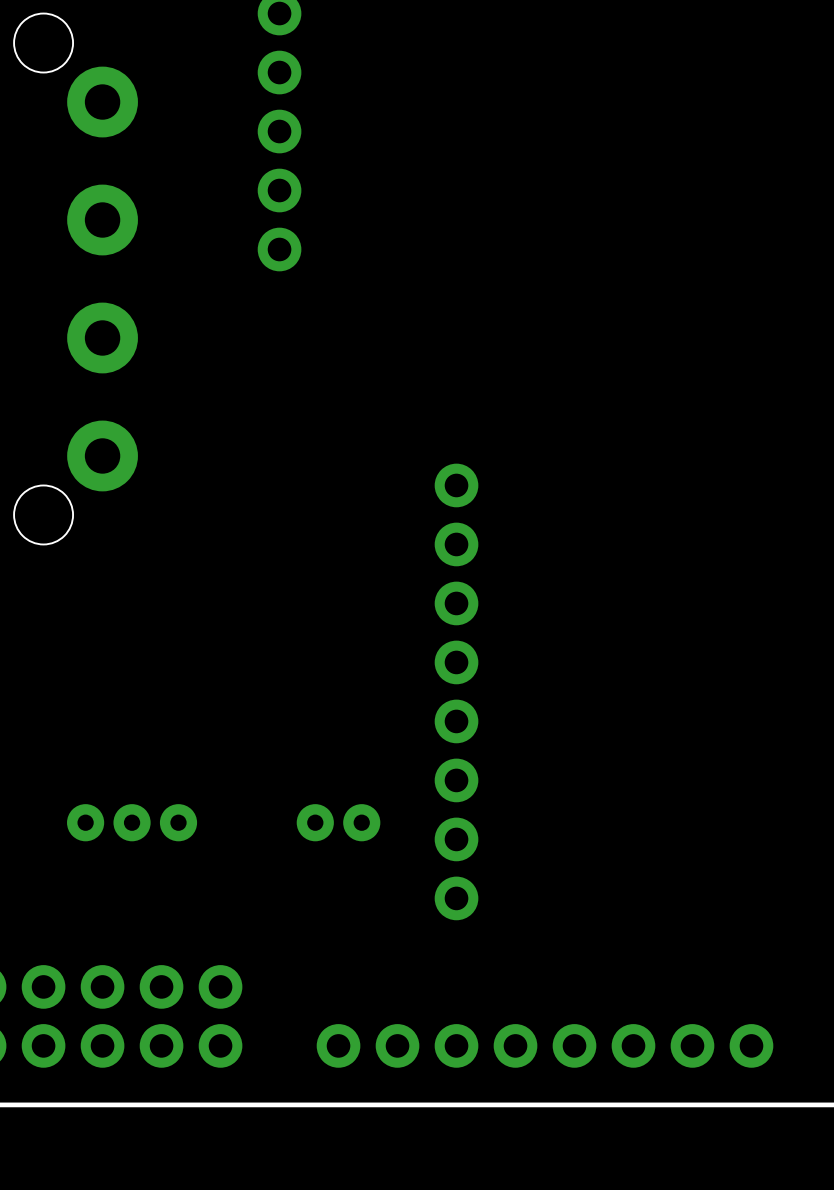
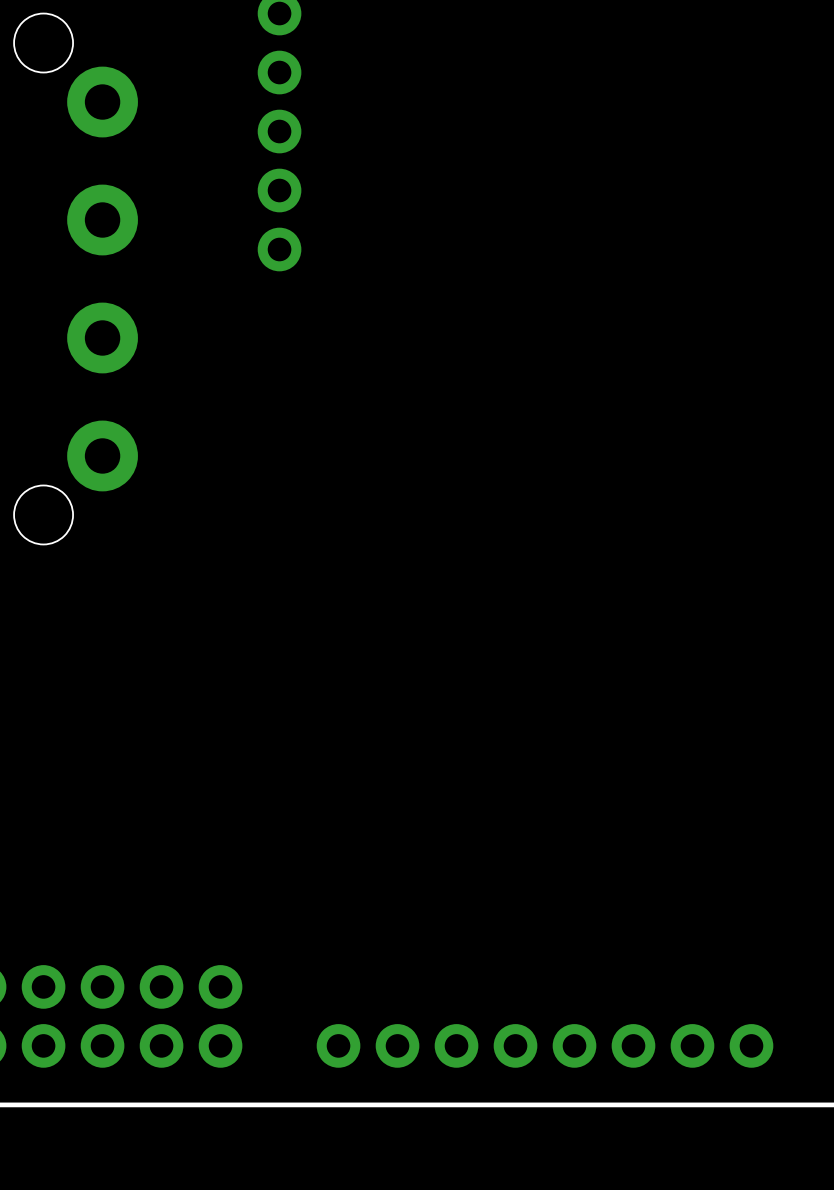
part: (456, 691) -> none
part: (132, 822) -> none
part: (338, 822) -> none

